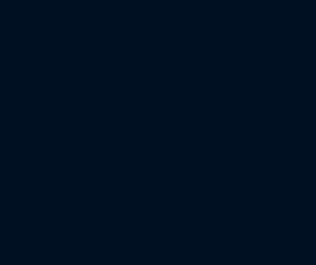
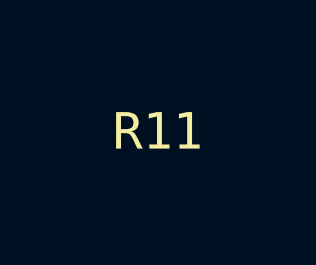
R11: none -> (157, 130)

